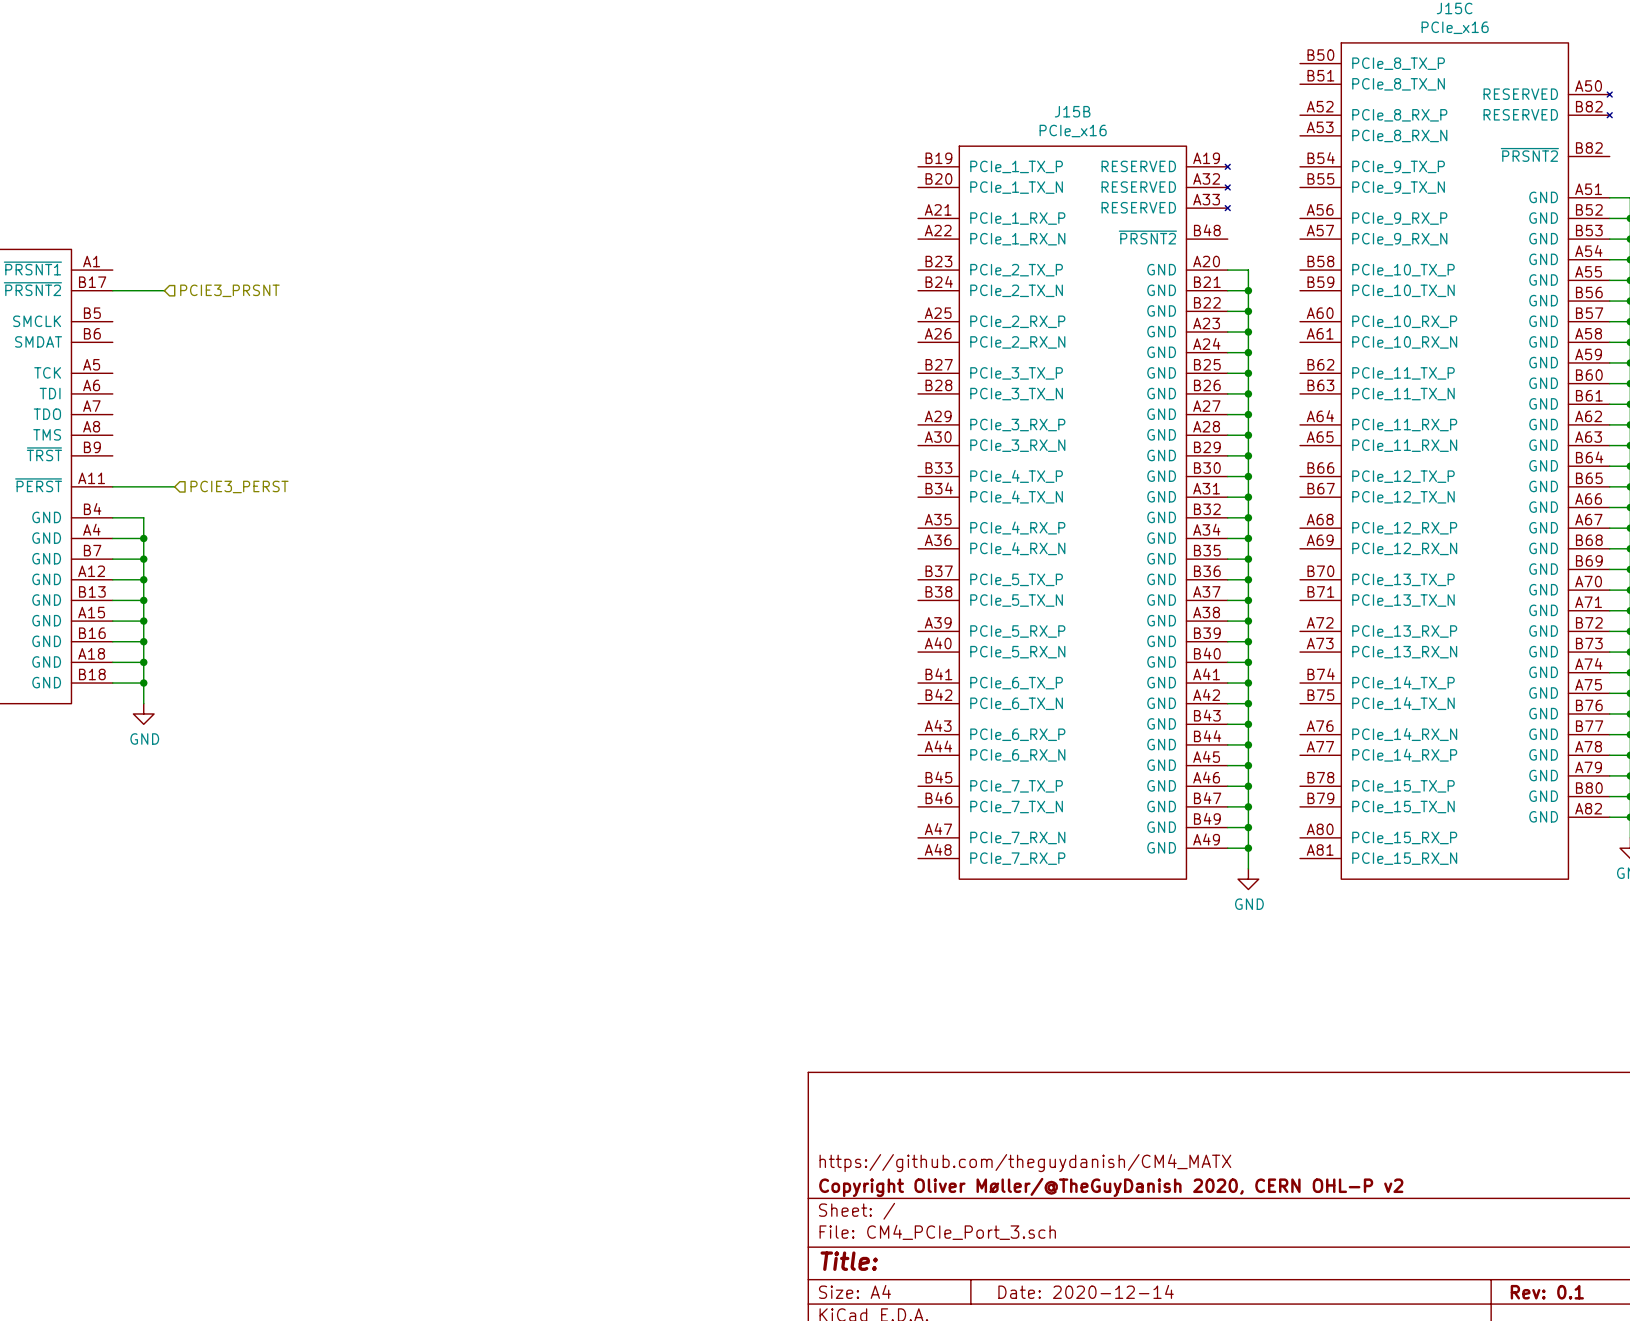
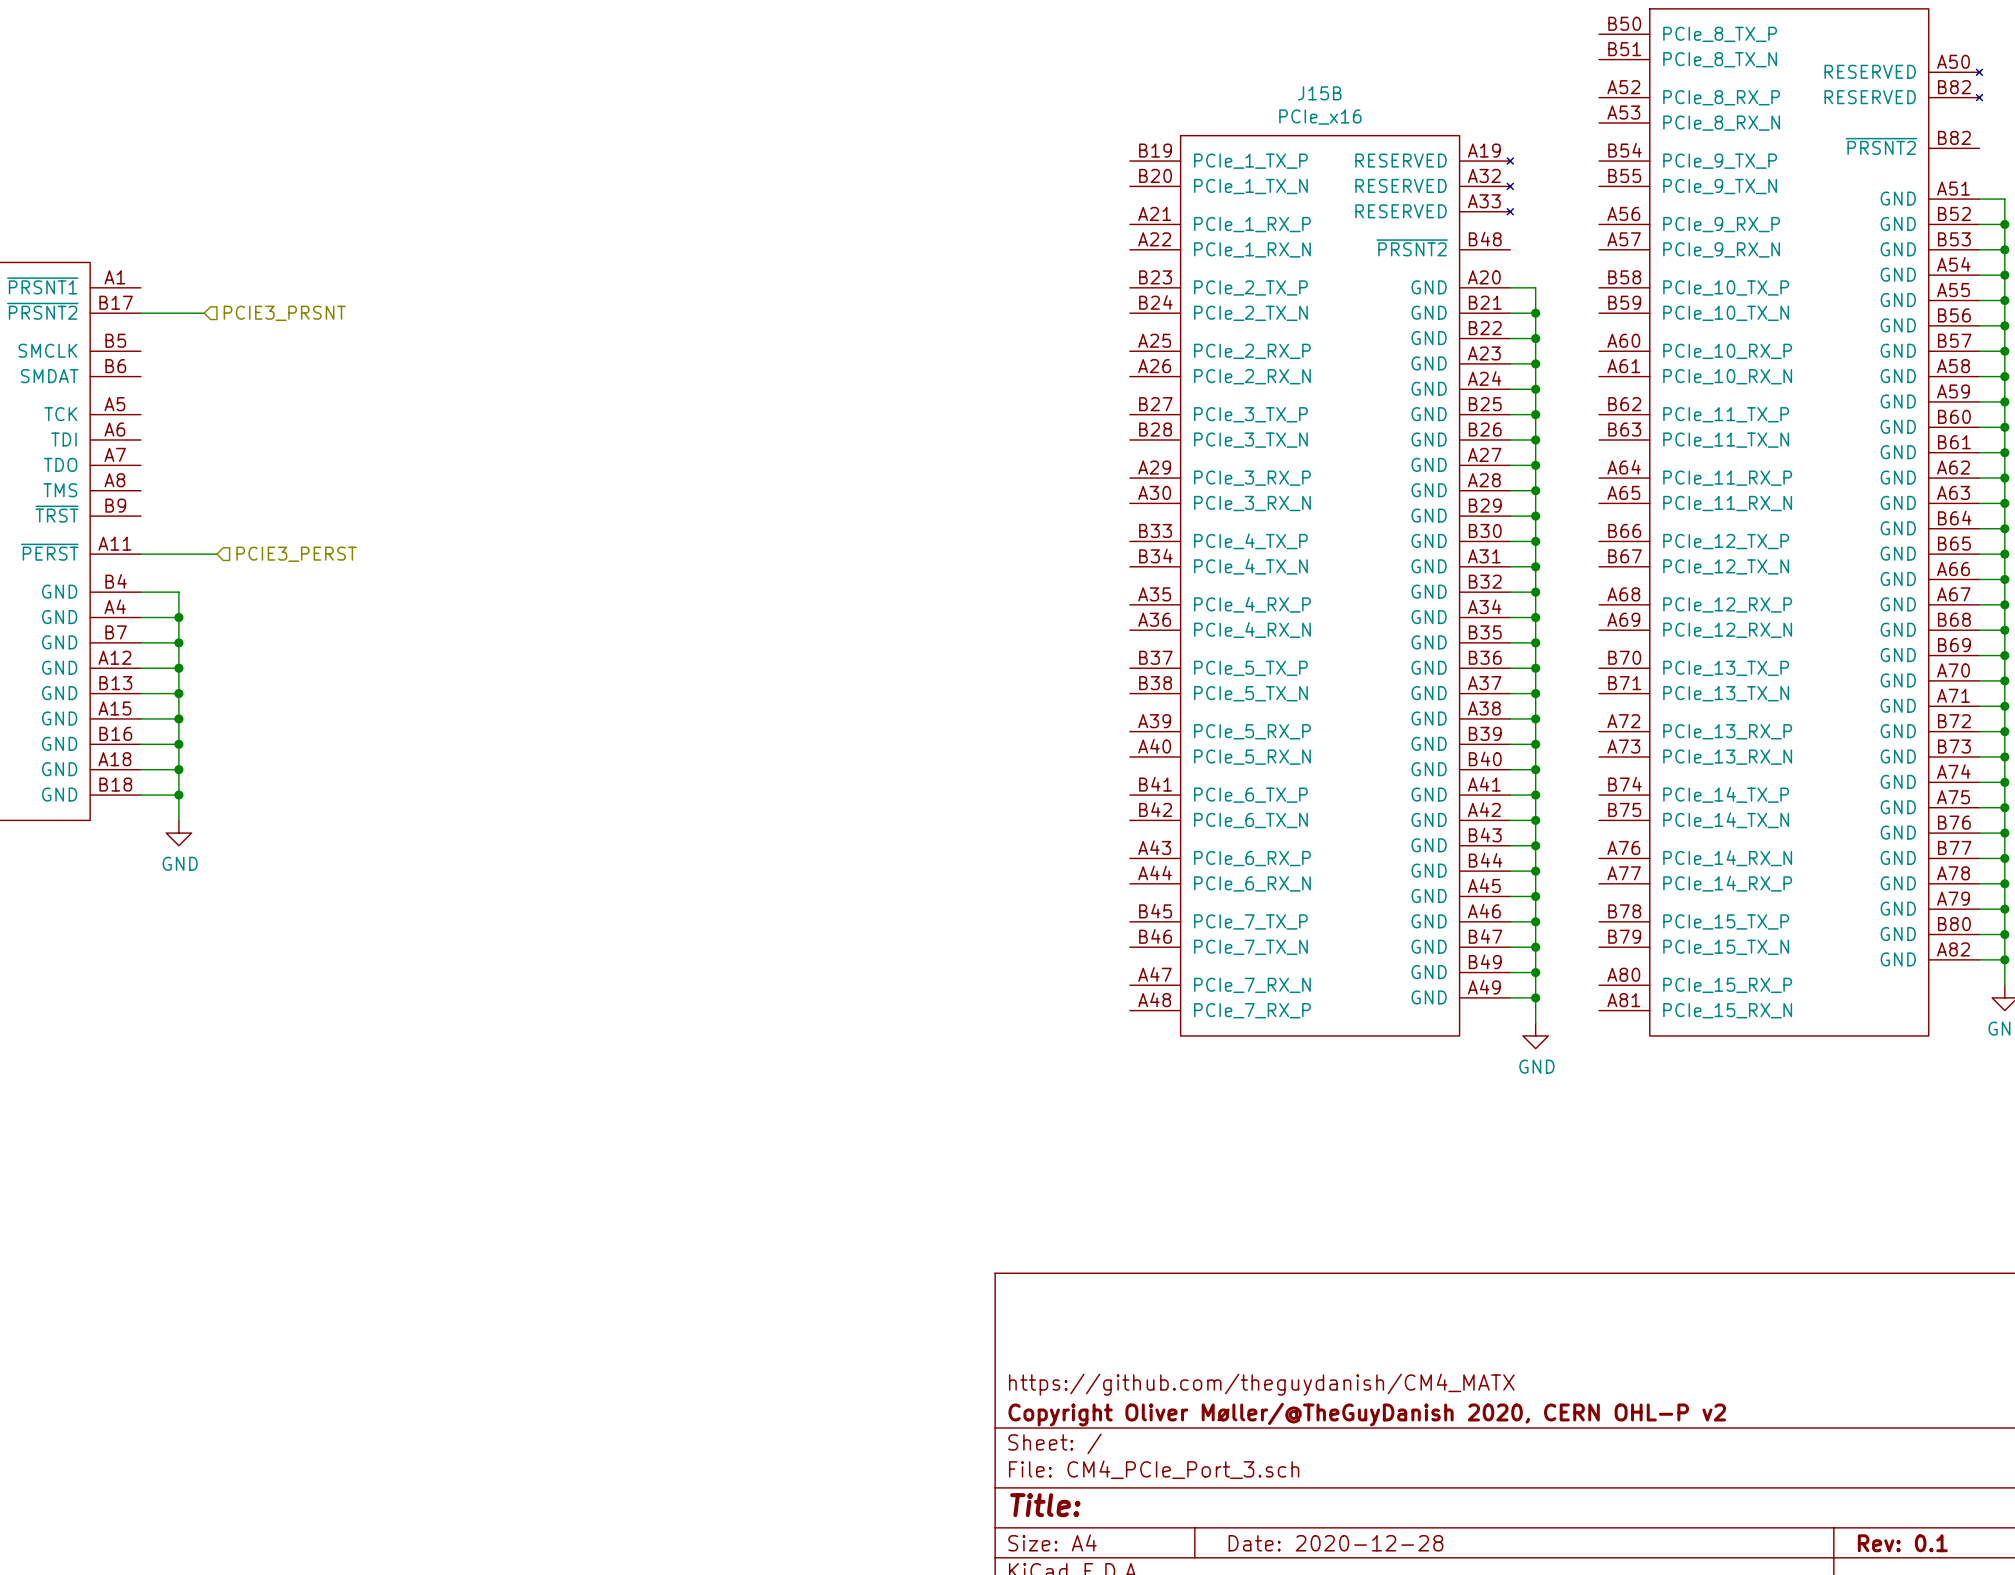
title block: Date: 2020-12-14 (1086, 1291) -> Date: 2020-12-28 (1335, 1543)

